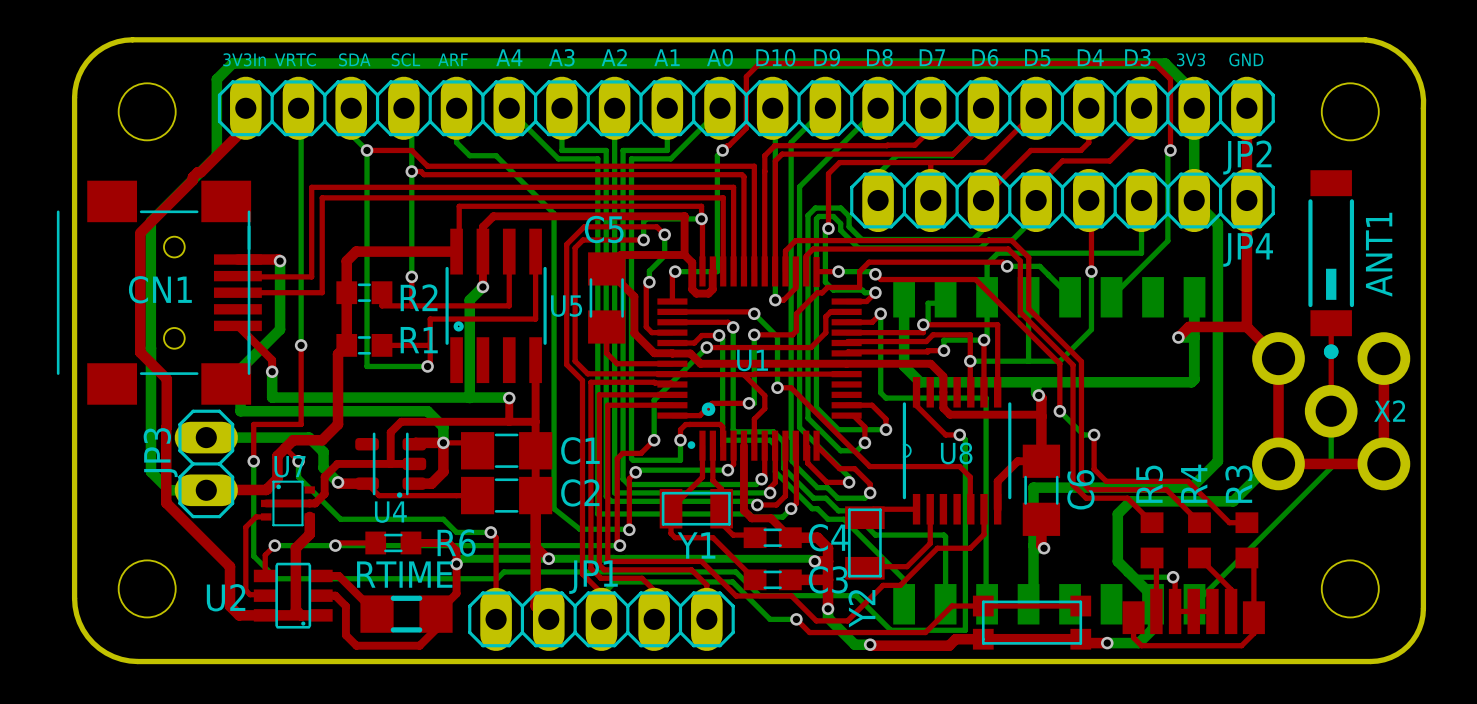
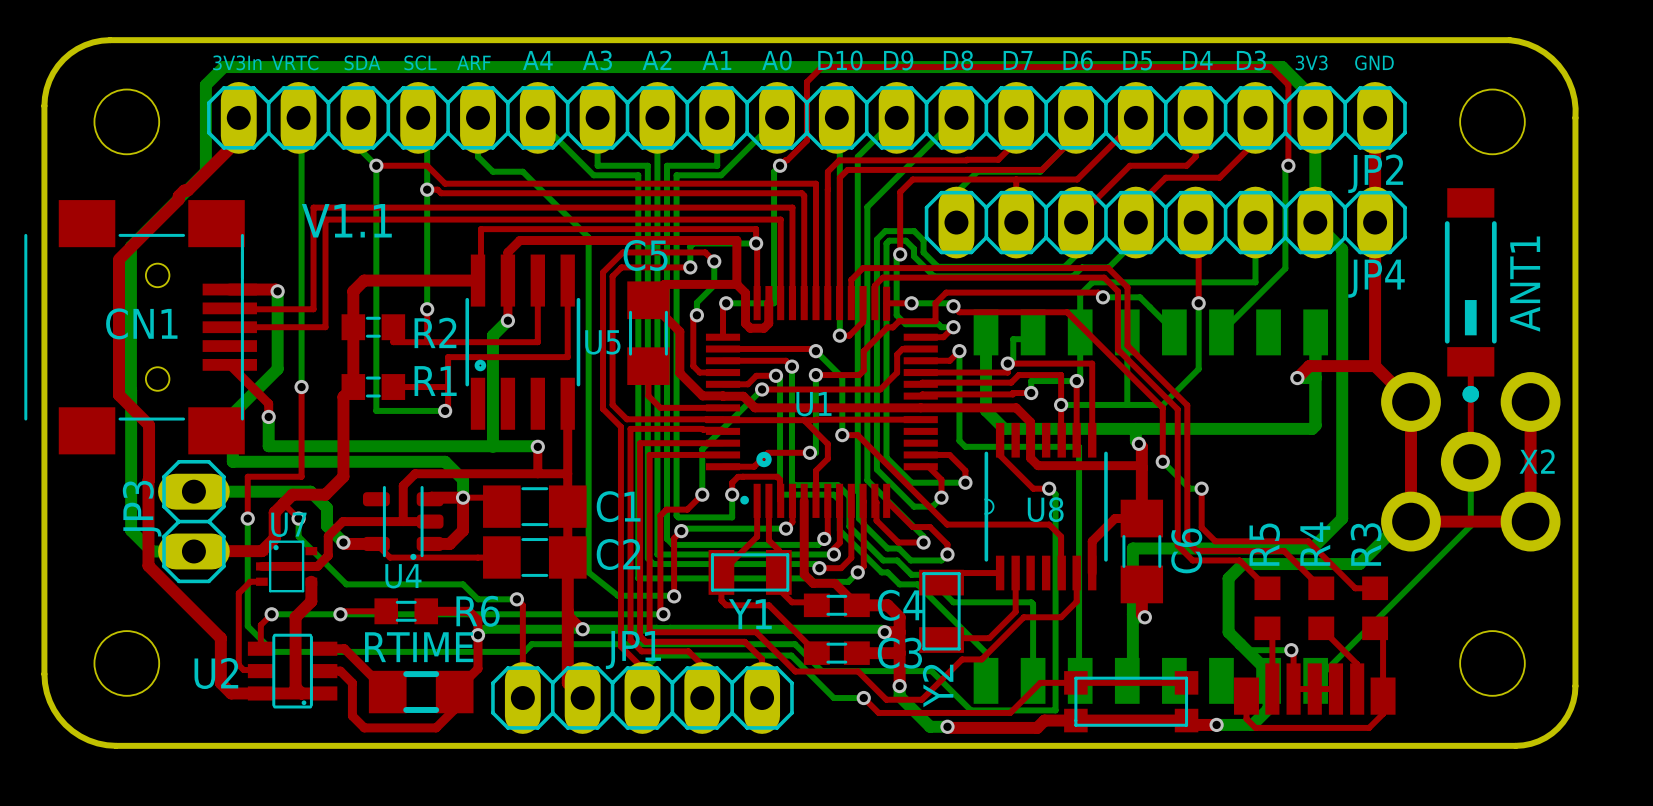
text: none -> V1.1 (346, 220)

